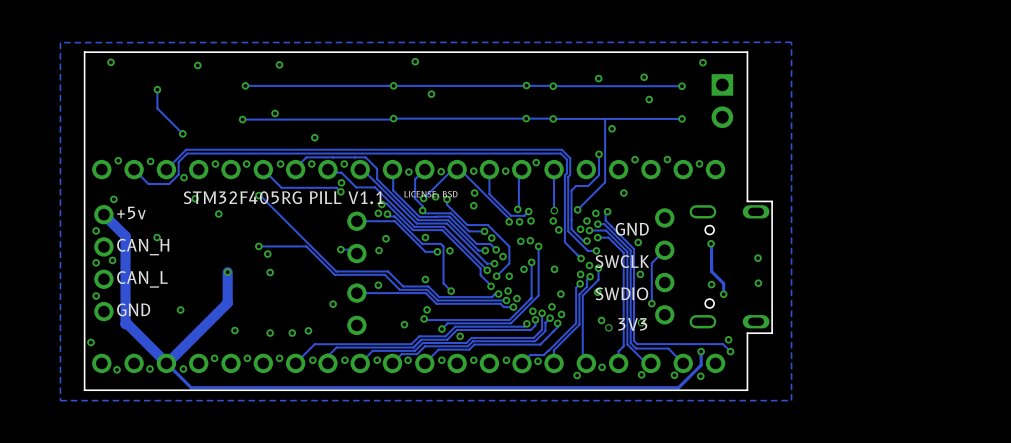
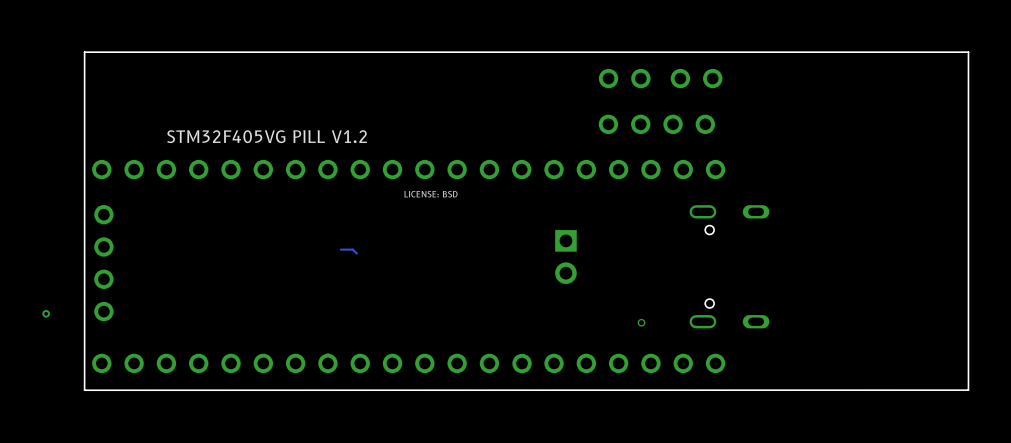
zone outline: (791, 42) (791, 400) (60, 400) (60, 42) (791, 42) -> none
board edge: (747, 52) (747, 201) (772, 201) (772, 333) (747, 333) (747, 390) (84, 390) -> (747, 52) (968, 52) (968, 390) (84, 390)
via: (415, 61) -> none
via: (110, 62) -> none
via: (702, 62) -> none
via: (279, 64) -> none
via: (197, 65) -> none
via: (644, 77) -> none
via: (598, 78) -> none
part: none -> (624, 78)
part: none -> (696, 78)
track: (245, 85) (682, 86) -> none
via: (245, 85) -> none
via: (393, 85) -> none
via: (526, 85) -> none
via: (553, 86) -> none
via: (682, 86) -> none
track: (157, 89) (157, 108) (182, 133) -> none
via: (157, 89) -> none
via: (431, 94) -> none
via: (649, 99) -> none
part position: (722, 101) -> (565, 257)
via: (275, 113) -> none
via: (393, 118) -> none
via: (526, 118) -> none
via: (553, 118) -> none
track: (604, 118) (605, 182) (577, 209) -> none
track: (682, 118) (242, 119) -> none
via: (682, 118) -> none
via: (242, 119) -> none
via: (612, 128) -> none
via: (182, 133) -> none
text: none -> STM32F405VG PILL V1.2 (267, 136)
via: (314, 137) -> none
track: (599, 154) (599, 175) (588, 186) (576, 186) (571, 190) (571, 229) (583, 241) (586, 241) -> none
via: (599, 154) -> none
via: (635, 159) -> none
via: (667, 159) -> none
via: (118, 160) -> none
via: (150, 161) -> none
via: (536, 162) -> none
via: (699, 163) -> none
via: (215, 164) -> none
via: (246, 164) -> none
via: (280, 164) -> none
via: (311, 164) -> none
via: (344, 164) -> none
track: (134, 169) (148, 183) (169, 183) (178, 174) (178, 162) (187, 153) (560, 153) (566, 159) (566, 173) (564, 175) (564, 242) (581, 258) -> none
track: (166, 169) (186, 149) (561, 149) (570, 158) (568, 231) (587, 250) (596, 250) -> none
track: (263, 169) (281, 187) (336, 187) (340, 191) -> none
track: (296, 169) (306, 157) (365, 157) (377, 168) (377, 179) (418, 220) (448, 220) (478, 250) (485, 250) -> none
track: (327, 169) (333, 172) (341, 172) (356, 187) (375, 187) (414, 226) (443, 226) (487, 270) -> none
track: (360, 169) (362, 169) (416, 223) (446, 223) (487, 263) (494, 263) -> none
track: (392, 169) (393, 190) (419, 216) (449, 216) (476, 244) (490, 244) (496, 249) -> none
track: (424, 169) (415, 179) (415, 198) (422, 206) (422, 210) (425, 213) (450, 213) (469, 231) (484, 231) -> none
track: (460, 169) (452, 169) (423, 198) -> none
track: (460, 169) (509, 218) (509, 221) -> none
track: (489, 169) (489, 194) (511, 215) (524, 215) (528, 211) -> none
track: (522, 169) (518, 173) (517, 209) -> none
track: (554, 169) (554, 210) -> none
via: (441, 171) -> none
via: (473, 171) -> none
via: (505, 171) -> none
via: (408, 172) -> none
via: (184, 177) -> none
via: (341, 182) -> none
via: (340, 191) -> none
via: (474, 193) -> none
via: (623, 193) -> none
track: (258, 195) (336, 271) (388, 271) (403, 286) (428, 286) (439, 297) (492, 297) (494, 294) (498, 294) -> none
via: (258, 195) -> none
via: (435, 196) -> none
text: STM32F405RG PILL V1.1 (283, 197) -> none
via: (195, 198) -> none
via: (423, 198) -> none
via: (113, 199) -> none
track: (447, 199) (447, 204) (467, 225) (487, 225) (509, 246) (509, 263) (496, 276) -> none
via: (447, 199) -> none
track: (381, 204) (386, 203) (413, 230) (442, 230) (480, 268) (480, 275) (491, 286) -> none
via: (381, 204) -> none
via: (473, 205) -> none
via: (517, 209) -> none
via: (577, 209) -> none
via: (422, 210) -> none
via: (554, 210) -> none
via: (528, 211) -> none
track: (607, 211) (605, 220) (611, 226) -> none
via: (607, 211) -> none
text: +5v (131, 213) -> none
via: (378, 213) -> none
via: (595, 213) -> none
track: (103, 214) (125, 236) (125, 324) (167, 363) -> none
via: (218, 214) -> none
track: (387, 214) (394, 216) (422, 243) (441, 243) (443, 246) (443, 283) (451, 291) -> none
via: (387, 214) -> none
track: (356, 221) (394, 221) (425, 251) (437, 251) -> none
via: (509, 221) -> none
via: (519, 221) -> none
via: (530, 221) -> none
via: (553, 221) -> none
via: (586, 221) -> none
track: (597, 224) (604, 224) (630, 250) (630, 343) (636, 348) (668, 348) (683, 363) -> none
via: (597, 224) -> none
track: (611, 226) (634, 248) (634, 340) (637, 344) (723, 344) (730, 351) -> none
via: (558, 229) -> none
via: (580, 229) -> none
text: GND (632, 229) -> none
via: (96, 230) -> none
track: (589, 230) (606, 230) (627, 251) (627, 344) (646, 363) (650, 363) -> none
via: (589, 230) -> none
via: (484, 231) -> none
via: (157, 237) -> none
part: (356, 237) -> none
via: (425, 237) -> none
track: (597, 237) (608, 237) (623, 252) (623, 346) (618, 351) (618, 363) -> none
via: (597, 237) -> none
via: (386, 238) -> none
via: (491, 238) -> none
via: (530, 240) -> none
via: (520, 241) -> none
via: (586, 241) -> none
via: (638, 242) -> none
track: (711, 243) (711, 271) (723, 283) (723, 294) -> none
via: (711, 243) -> none
track: (258, 246) (306, 246) (334, 274) (384, 274) (399, 289) (427, 289) (437, 300) (506, 300) -> none
via: (258, 246) -> none
track: (538, 246) (538, 295) (510, 323) (447, 323) (441, 329) -> none
via: (538, 246) -> none
text: CAN_H (143, 247) -> none
via: (340, 249) -> none
via: (496, 249) -> none
via: (379, 250) -> none
via: (449, 250) -> none
via: (485, 250) -> none
via: (596, 250) -> none
track: (664, 250) (651, 263) (651, 303) -> none
via: (437, 251) -> none
via: (267, 254) -> none
via: (503, 256) -> none
via: (581, 258) -> none
via: (757, 258) -> none
via: (112, 260) -> none
text: SWCLK (622, 261) -> none
via: (96, 262) -> none
track: (531, 262) (531, 297) (509, 320) (424, 318) -> none
via: (531, 262) -> none
via: (494, 263) -> none
via: (589, 265) -> none
part rotation: 0° (664, 266) -> 90° clockwise (656, 124)
part position: (664, 266) -> (656, 124)
track: (598, 268) (598, 279) (582, 295) (582, 359) (586, 363) -> none
via: (598, 268) -> none
via: (523, 269) -> none
via: (554, 269) -> none
via: (487, 270) -> none
track: (227, 272) (227, 303) (167, 363) -> none
via: (227, 272) -> none
via: (270, 272) -> none
via: (580, 274) -> none
via: (640, 274) -> none
via: (496, 276) -> none
via: (509, 276) -> none
track: (590, 276) (587, 279) (587, 286) (579, 294) (579, 324) (554, 350) (554, 363) -> none
via: (590, 276) -> none
text: CAN_L (142, 279) -> none
via: (425, 279) -> none
track: (580, 283) (576, 287) (576, 323) (543, 355) (530, 355) (522, 363) -> none
via: (580, 283) -> none
via: (758, 283) -> none
via: (711, 284) -> none
via: (378, 285) -> none
via: (491, 286) -> none
via: (508, 290) -> none
via: (451, 291) -> none
via: (597, 292) -> none
track: (356, 293) (425, 293) (436, 303) (500, 303) (503, 307) (513, 307) -> none
text: SWDIO (621, 293) -> none
via: (498, 294) -> none
via: (560, 294) -> none
via: (723, 294) -> none
via: (96, 296) -> none
via: (517, 298) -> none
via: (506, 300) -> none
via: (651, 303) -> none
via: (333, 304) -> none
via: (551, 306) -> none
via: (513, 307) -> none
text: GND (133, 309) -> none
part: (356, 309) -> none
via: (427, 309) -> none
via: (180, 310) -> none
via: (532, 311) -> none
via: none -> (46, 313)
track: (542, 313) (542, 329) (533, 337) (471, 337) (466, 343) (422, 343) (415, 350) (372, 350) (360, 363) -> none
via: (542, 313) -> none
via: (561, 314) -> none
via: (424, 318) -> none
track: (550, 318) (545, 322) (545, 330) (535, 341) (472, 341) (467, 346) (424, 346) (417, 354) (401, 354) (392, 363) -> none
via: (550, 318) -> none
track: (535, 319) (535, 325) (530, 329) (457, 329) (447, 339) (421, 339) (413, 347) (336, 347) (327, 356) -> none
via: (535, 319) -> none
via: (601, 320) -> none
track: (526, 323) (524, 326) (455, 326) (445, 336) (419, 336) (411, 344) (314, 344) (295, 363) -> none
via: (526, 323) -> none
track: (557, 323) (557, 327) (540, 344) (474, 344) (469, 349) (438, 349) (424, 363) -> none
via: (557, 323) -> none
via: (404, 324) -> none
text: 3V3 (632, 324) -> none
via: (608, 327) -> none
via: (441, 329) -> none
via: (234, 330) -> none
via: (308, 330) -> none
via: (270, 333) -> none
via: (292, 333) -> none
via: (460, 336) -> none
via: (728, 339) -> none
via: (90, 342) -> none
track: (701, 351) (701, 365) (678, 387) (191, 387) (167, 363) -> none
via: (701, 351) -> none
via: (730, 351) -> none
via: (214, 358) -> none
via: (247, 358) -> none
via: (279, 358) -> none
via: (312, 360) -> none
via: (344, 360) -> none
via: (377, 360) -> none
via: (408, 360) -> none
via: (441, 360) -> none
via: (473, 360) -> none
via: (506, 360) -> none
via: (537, 361) -> none
via: (602, 367) -> none
via: (117, 369) -> none
via: (149, 369) -> none
via: (183, 369) -> none
via: (641, 374) -> none
via: (577, 375) -> none
via: (674, 375) -> none
via: (700, 376) -> none

